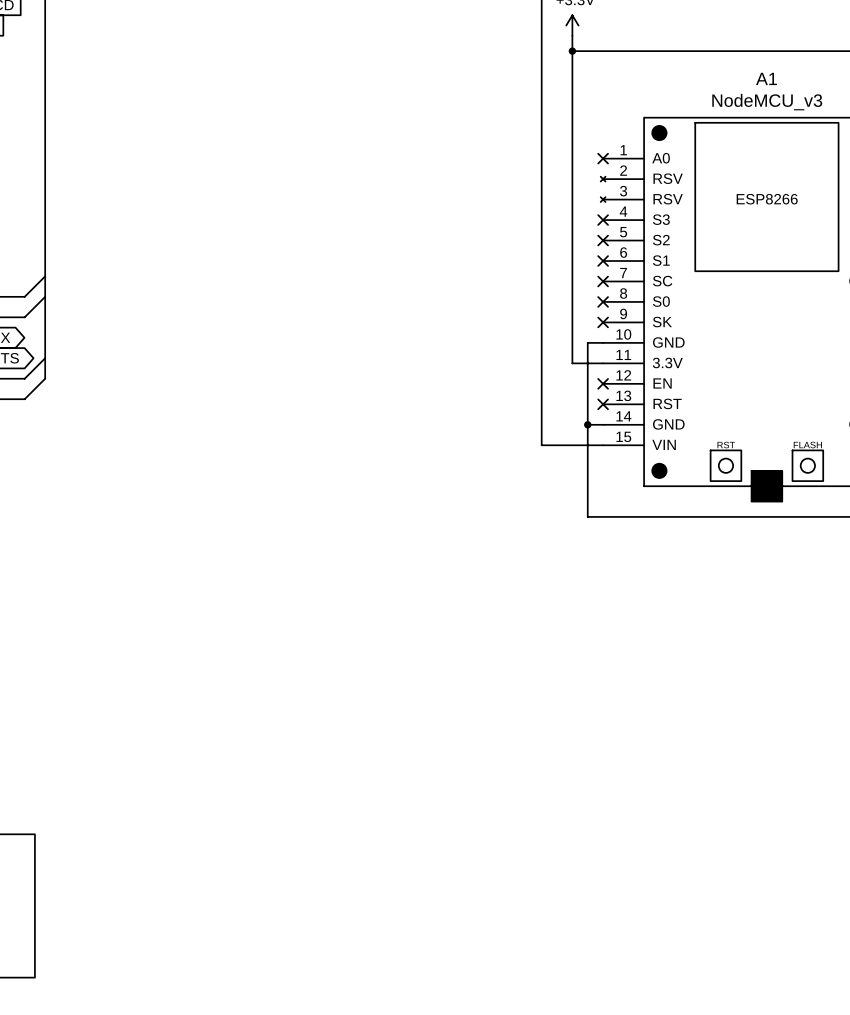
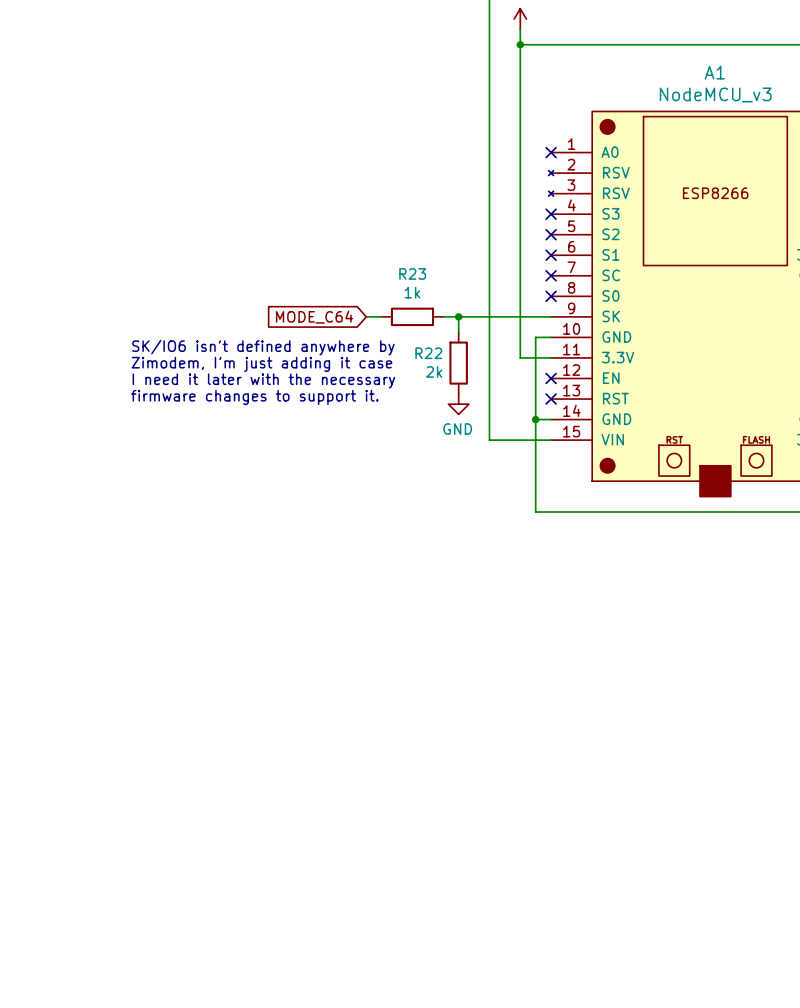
wire: none -> (366, 316) (381, 316)
R23: none -> 1k (412, 316)
wire: none -> (443, 316) (551, 316)
wire: none -> (458, 316) (458, 332)
junction: none -> (458, 316)
no-connect mark: (603, 322) -> none
global label: none -> MODE_C64 (314, 317)
text: none -> SK/IO6 isn't defined anywhere by (263, 347)
R22: none -> 2k (458, 363)
text: none -> Zimodem, I'm just adding it case (261, 364)
text: none -> I need it later with the necessary (263, 380)
text: none -> firmware changes to support it. (254, 397)
power symbol: none -> GND (458, 404)

